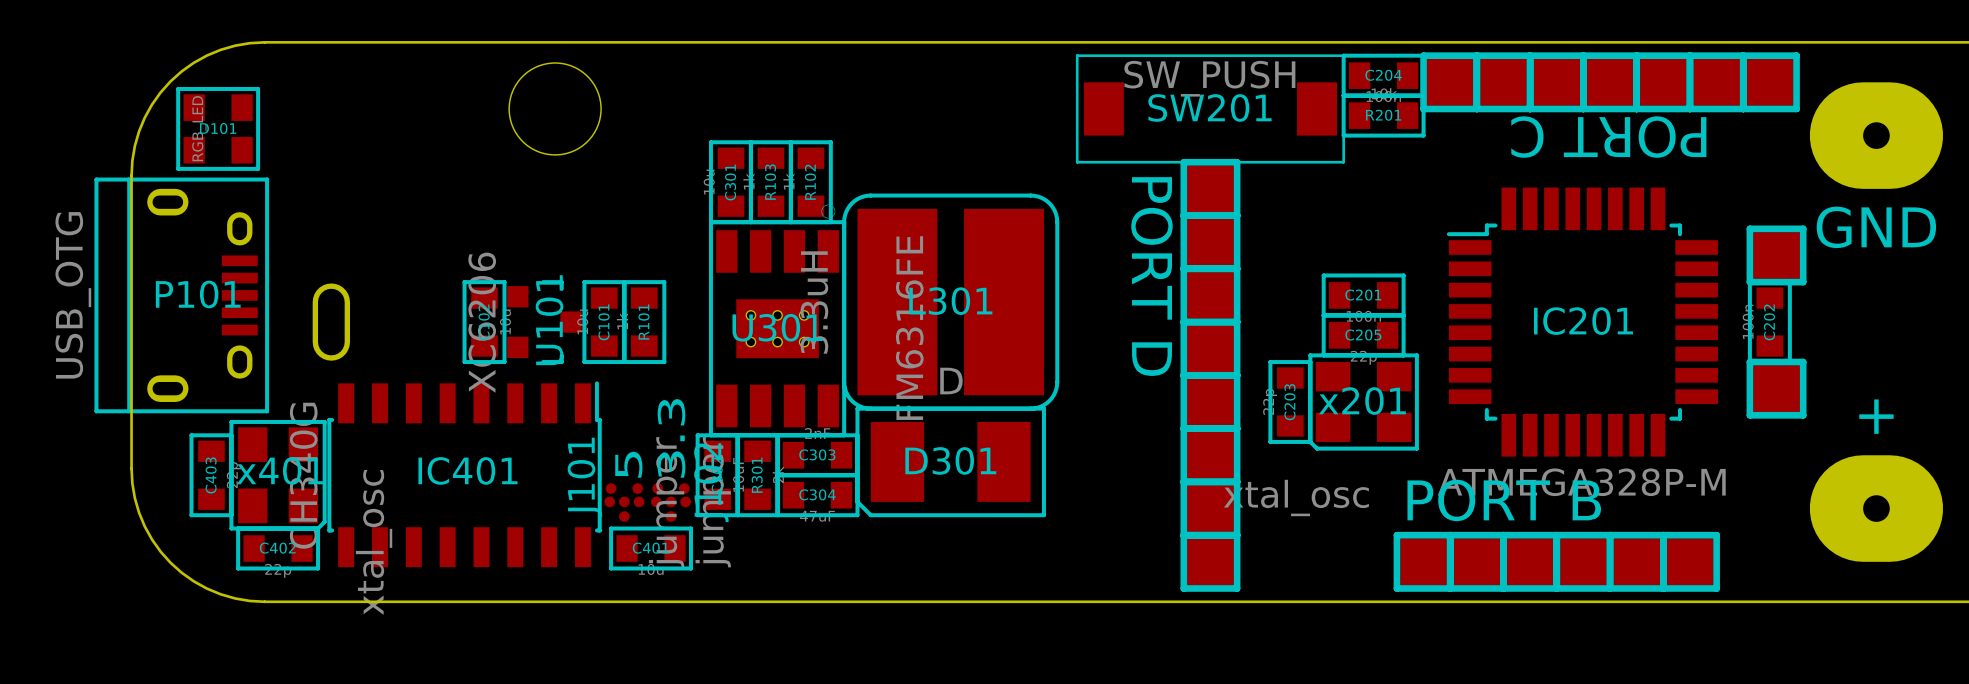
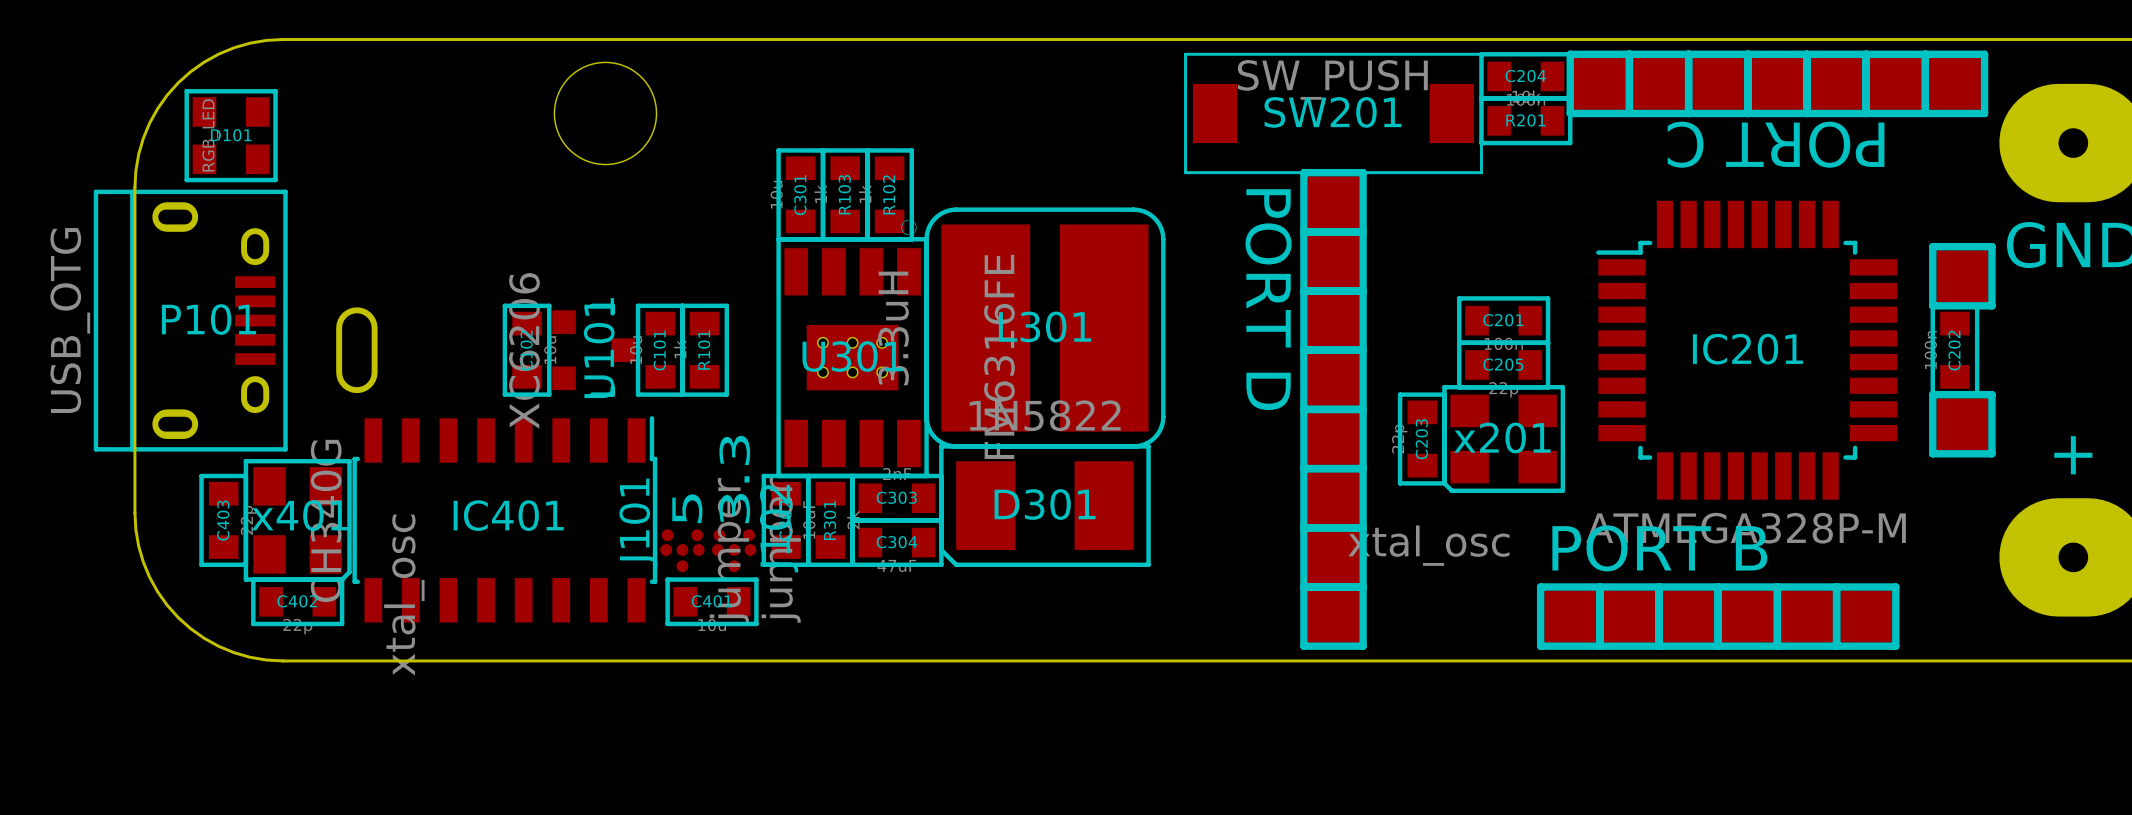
D301 value: D (951, 381) -> 1N5822 (1045, 415)

